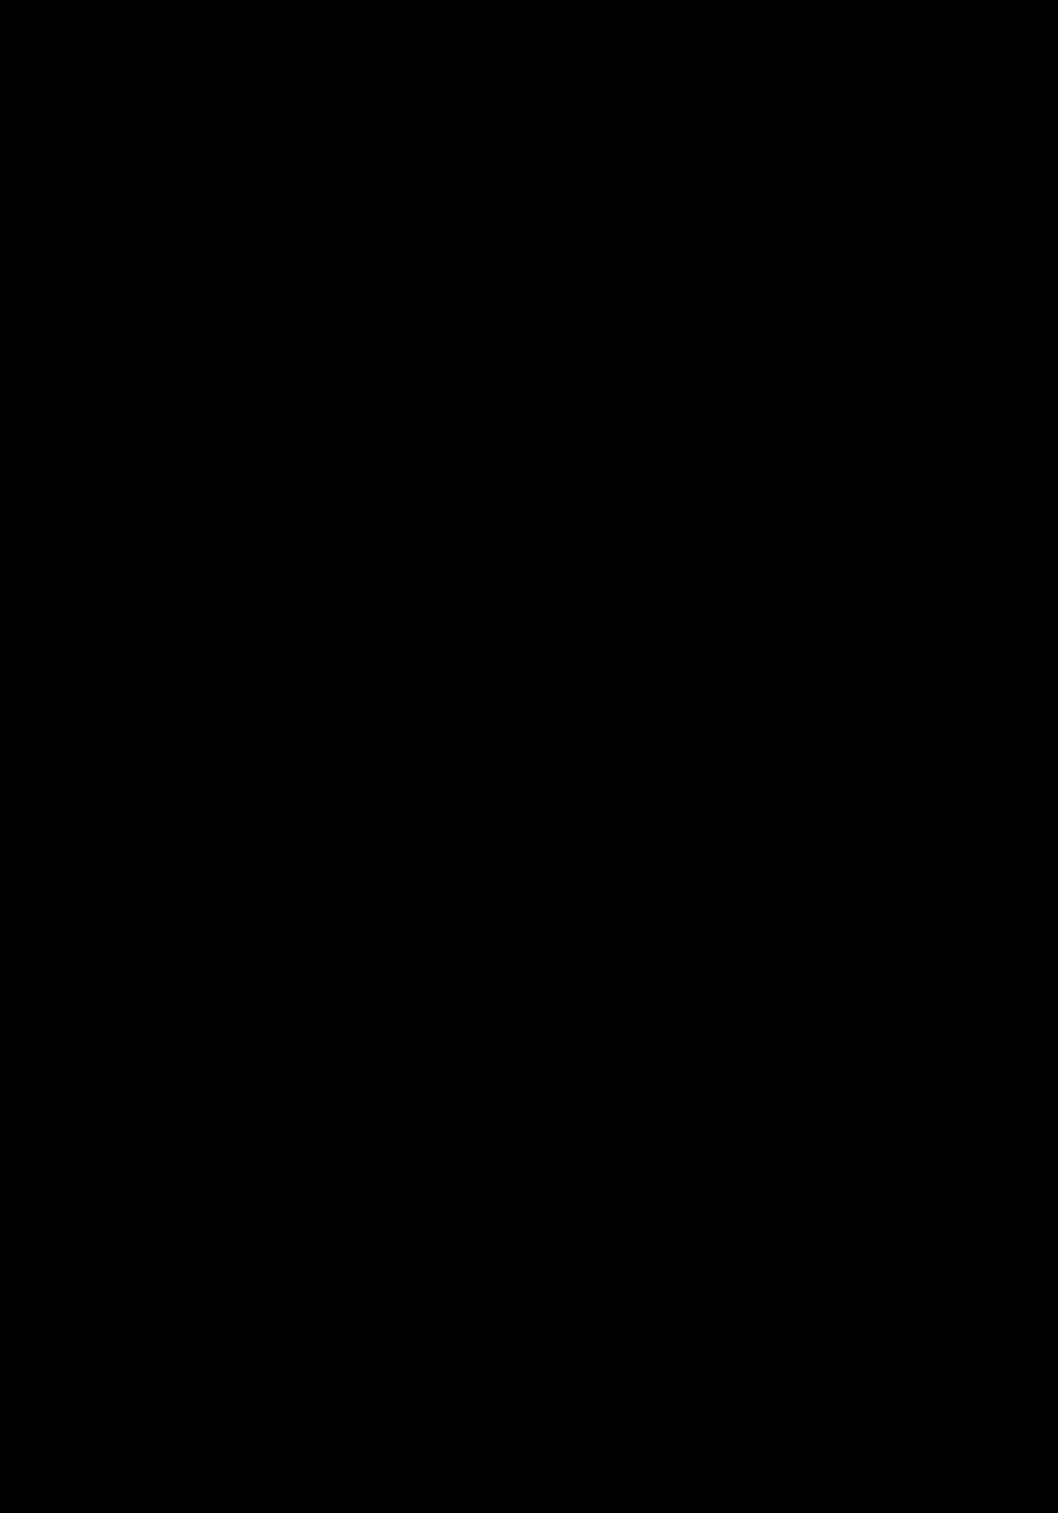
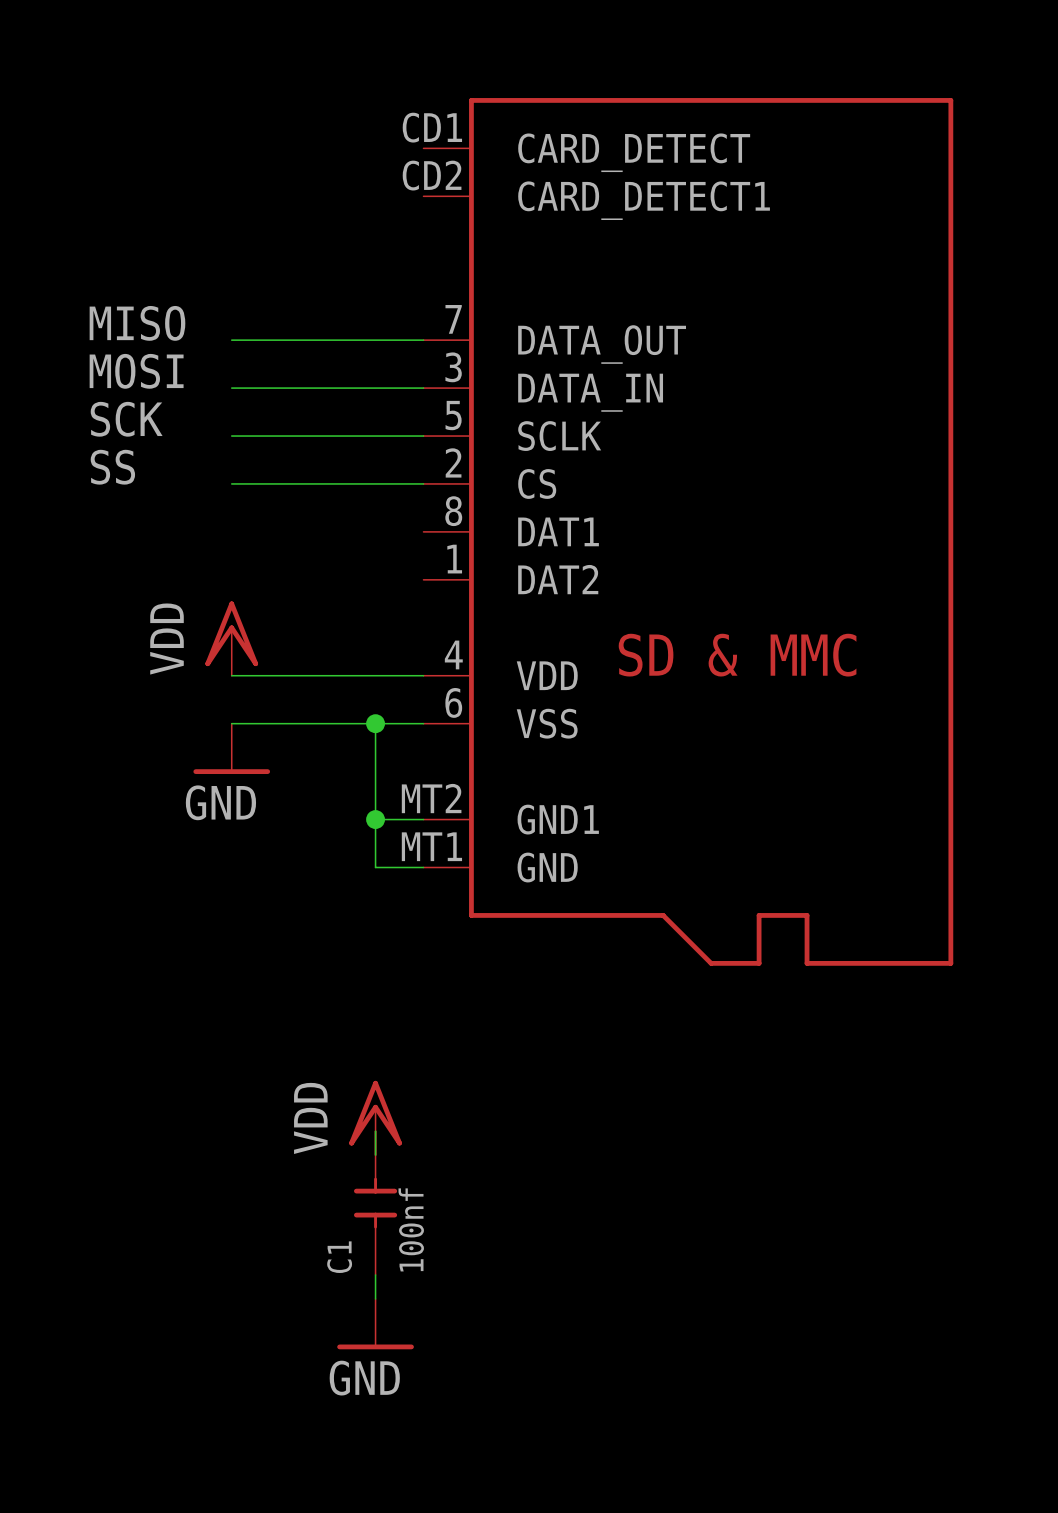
label: none -> MISO (137, 323)
wire: none -> (231, 340) (423, 340)
label: none -> MOSI (136, 371)
wire: none -> (231, 388) (423, 388)
label: none -> SCK (126, 419)
wire: none -> (231, 436) (423, 436)
label: none -> SS (112, 467)
wire: none -> (231, 483) (423, 483)
part: none -> (688, 531)
power symbol: none -> VDD (231, 638)
wire: none -> (231, 675) (423, 675)
wire: none -> (231, 723) (423, 723)
wire: none -> (375, 723) (375, 867) (423, 867)
junction: none -> (375, 723)
power symbol: none -> GND (231, 748)
wire: none -> (375, 819) (423, 819)
junction: none -> (375, 819)
power symbol: none -> VDD (375, 1117)
wire: none -> (375, 1131) (375, 1155)
C1: none -> 100nf (375, 1203)
wire: none -> (375, 1275) (375, 1298)
power symbol: none -> GND (375, 1324)

